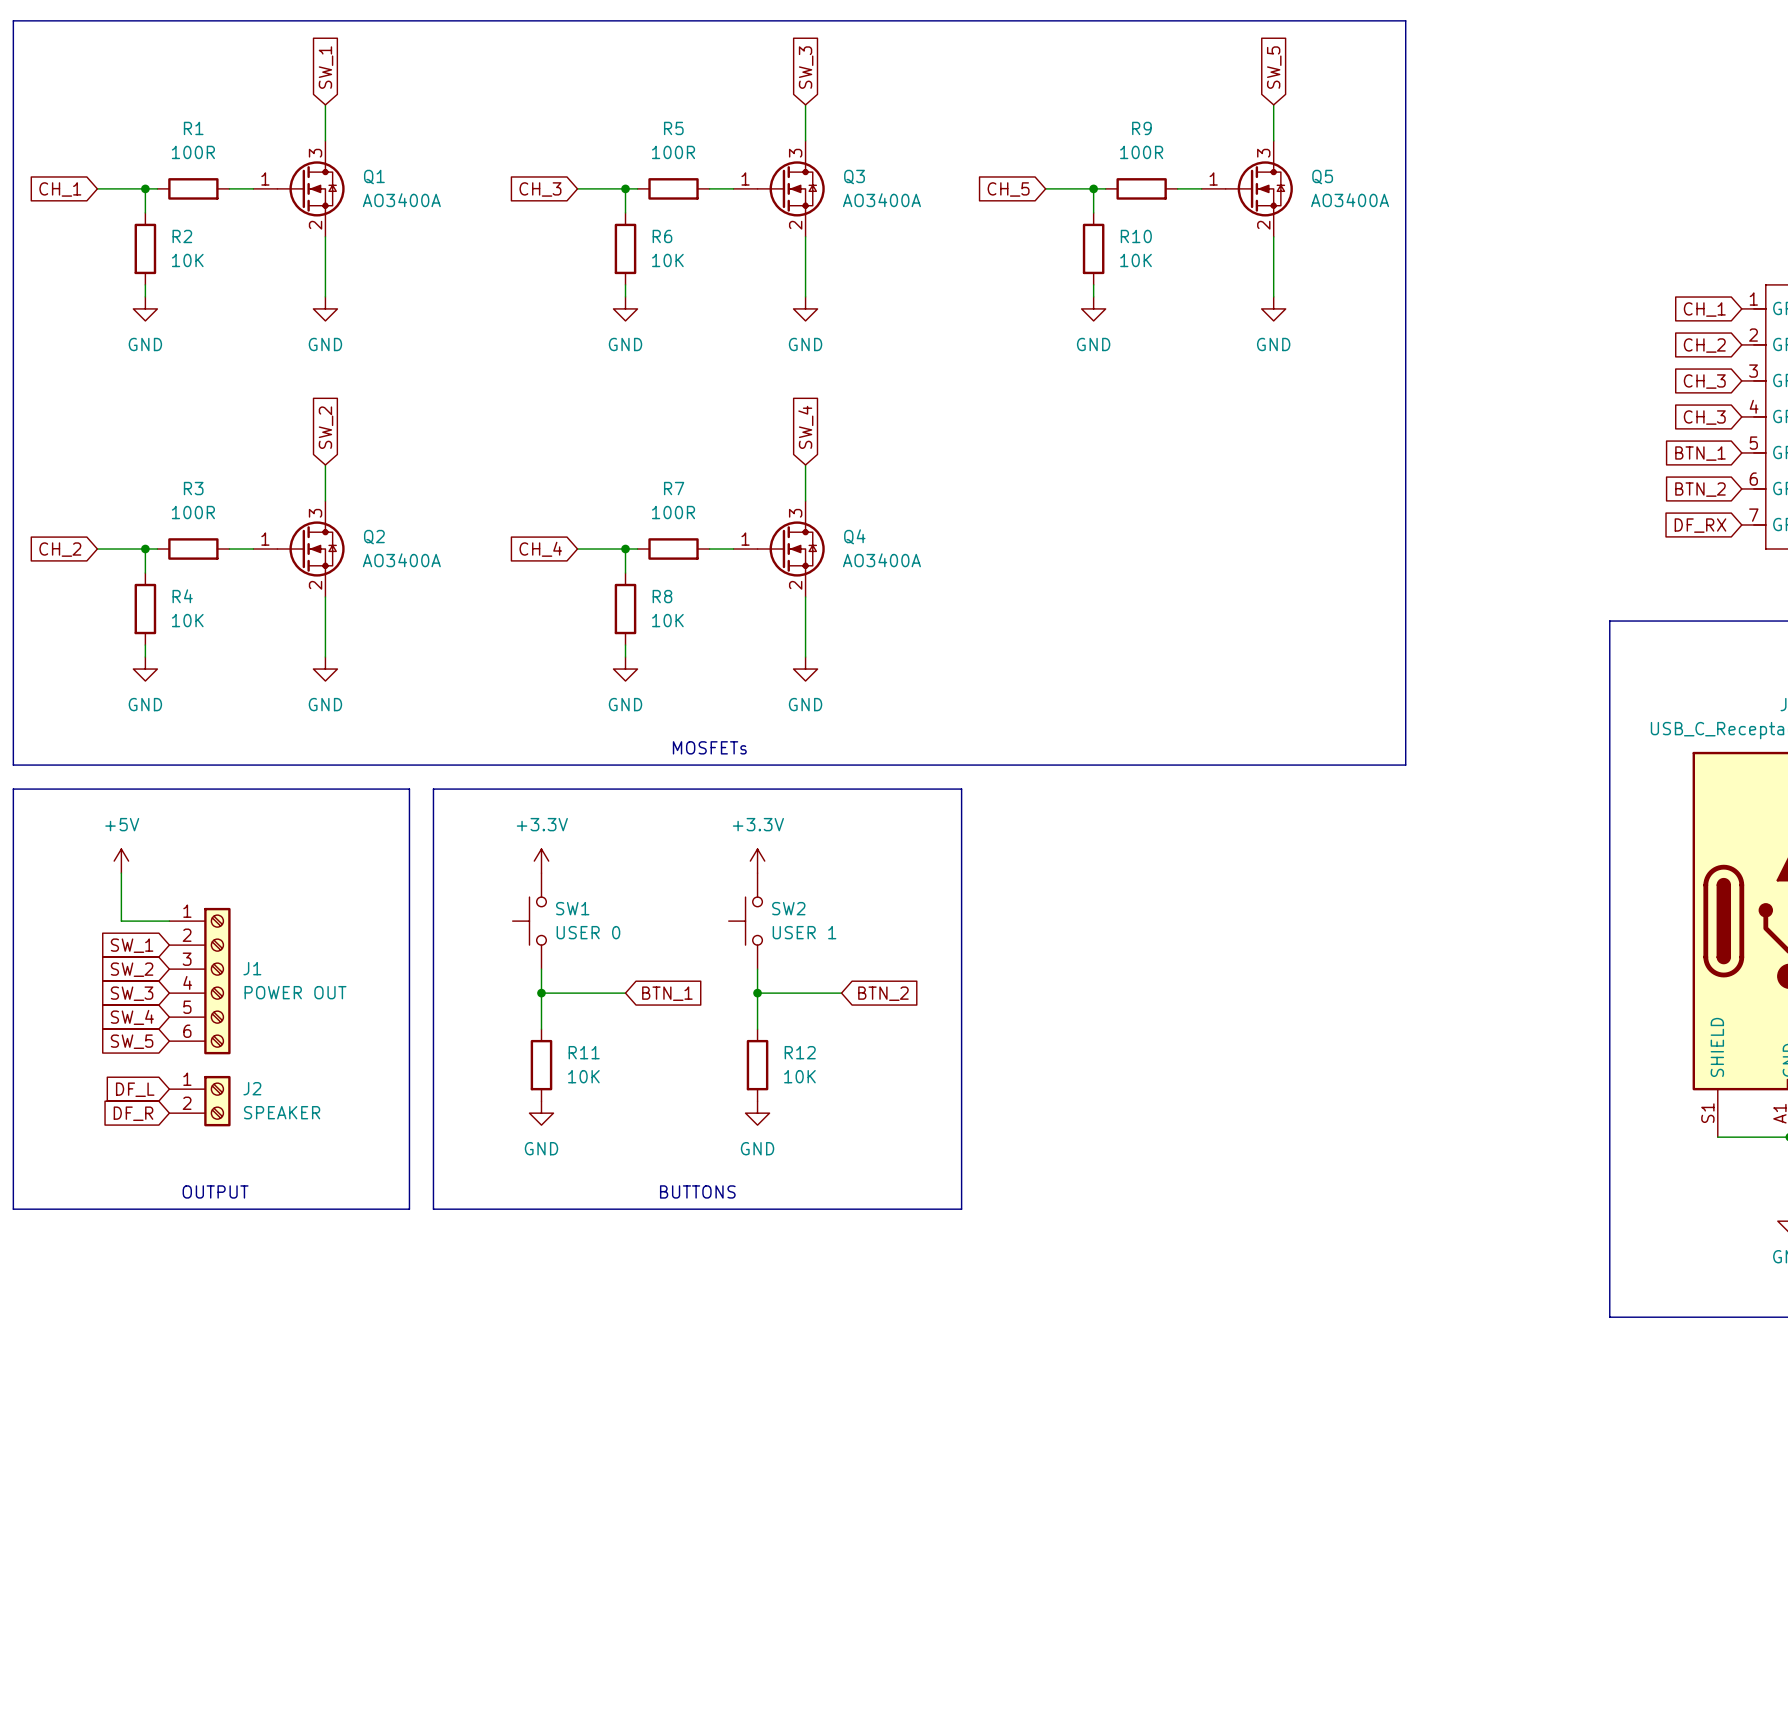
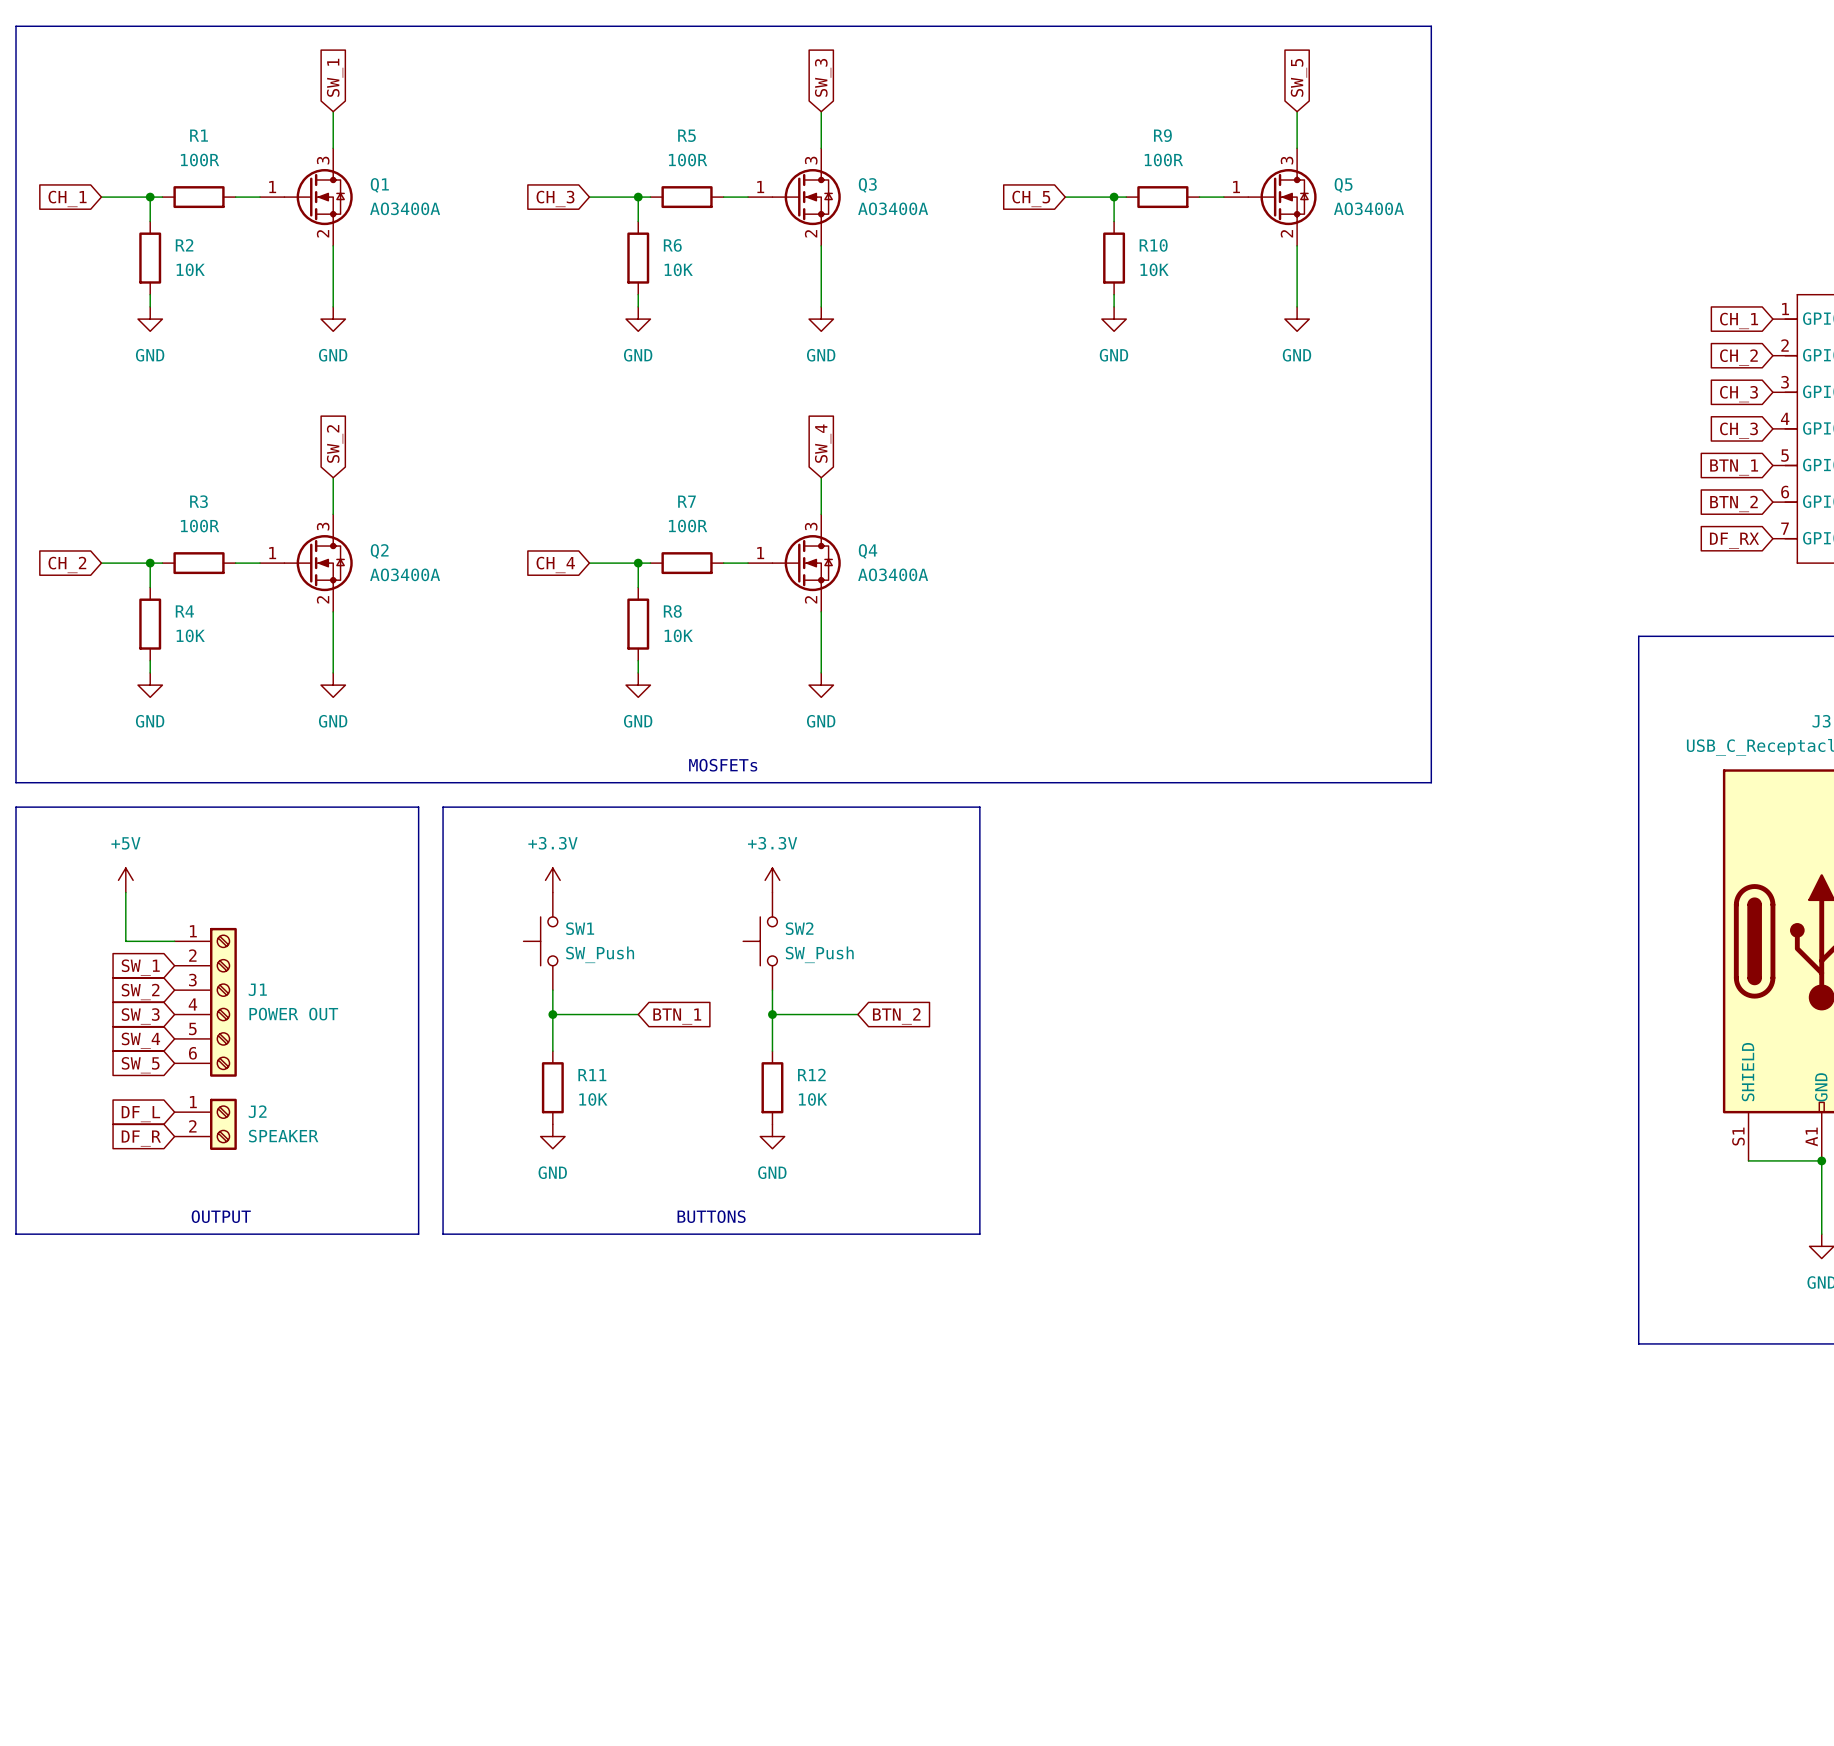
SW1 value: USER 0 (588, 932) -> SW_Push (600, 954)
SW2 value: USER 1 (804, 932) -> SW_Push (819, 954)

